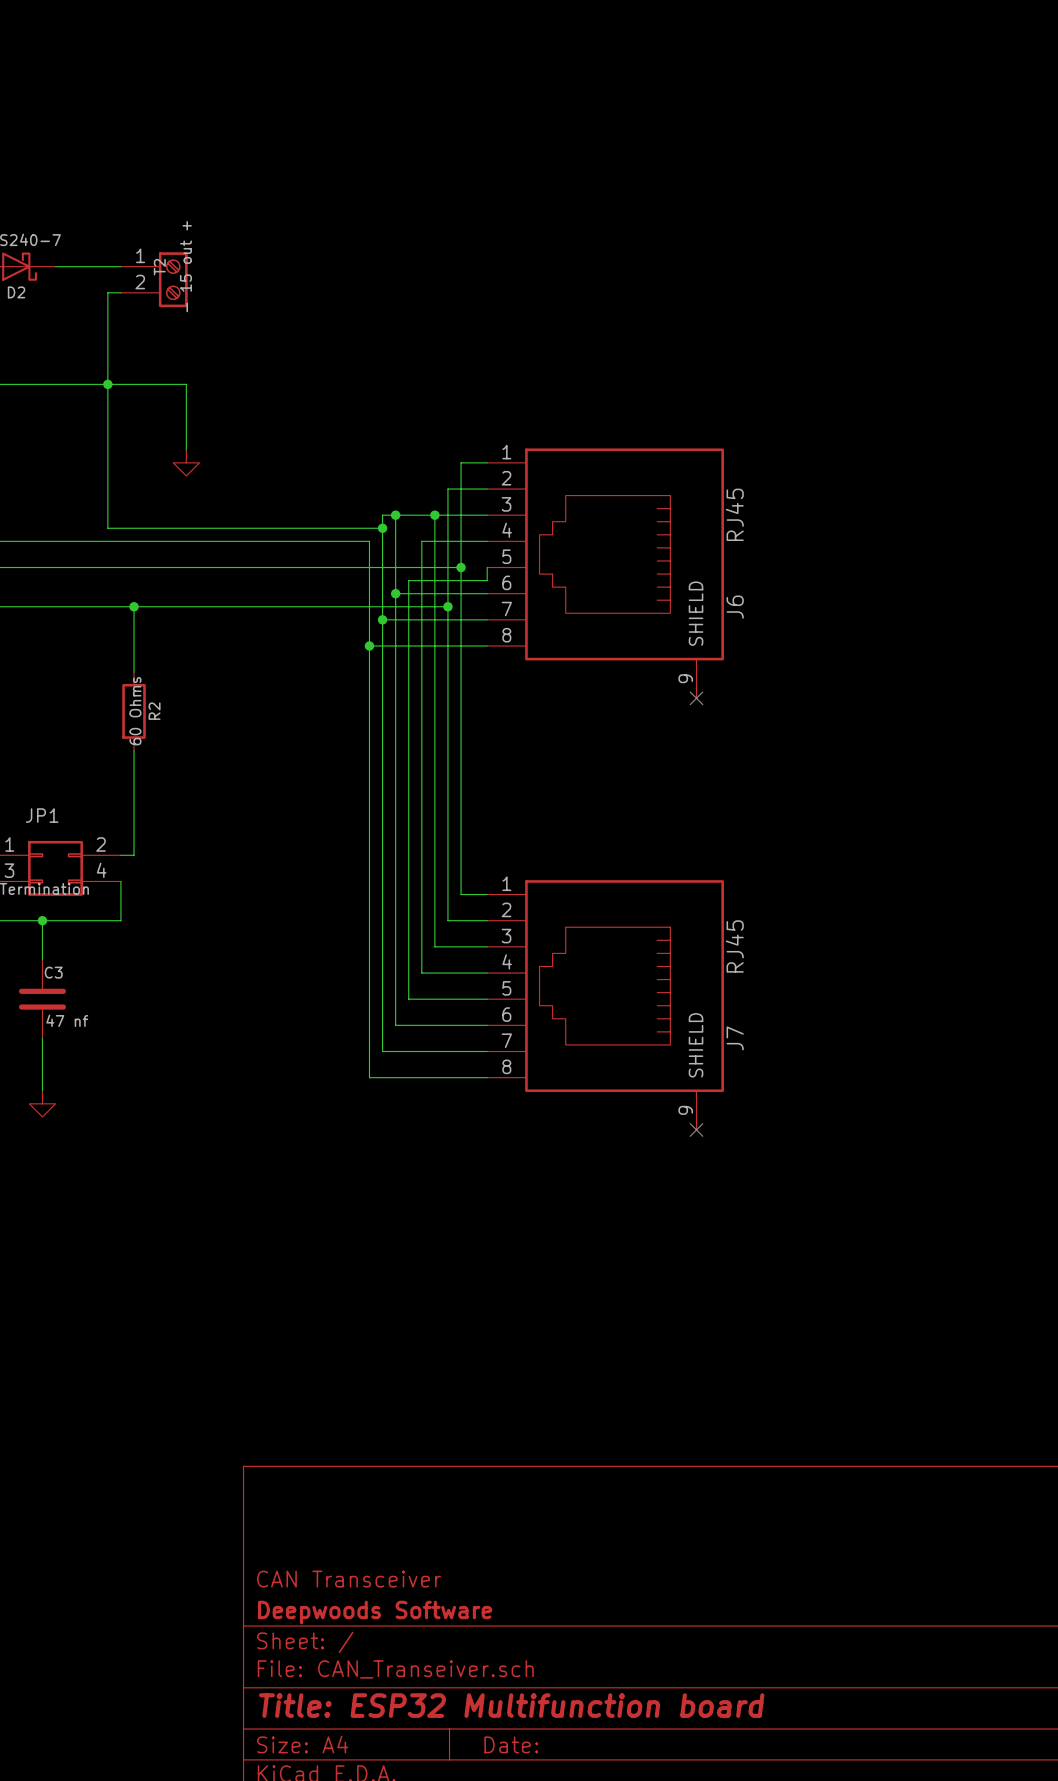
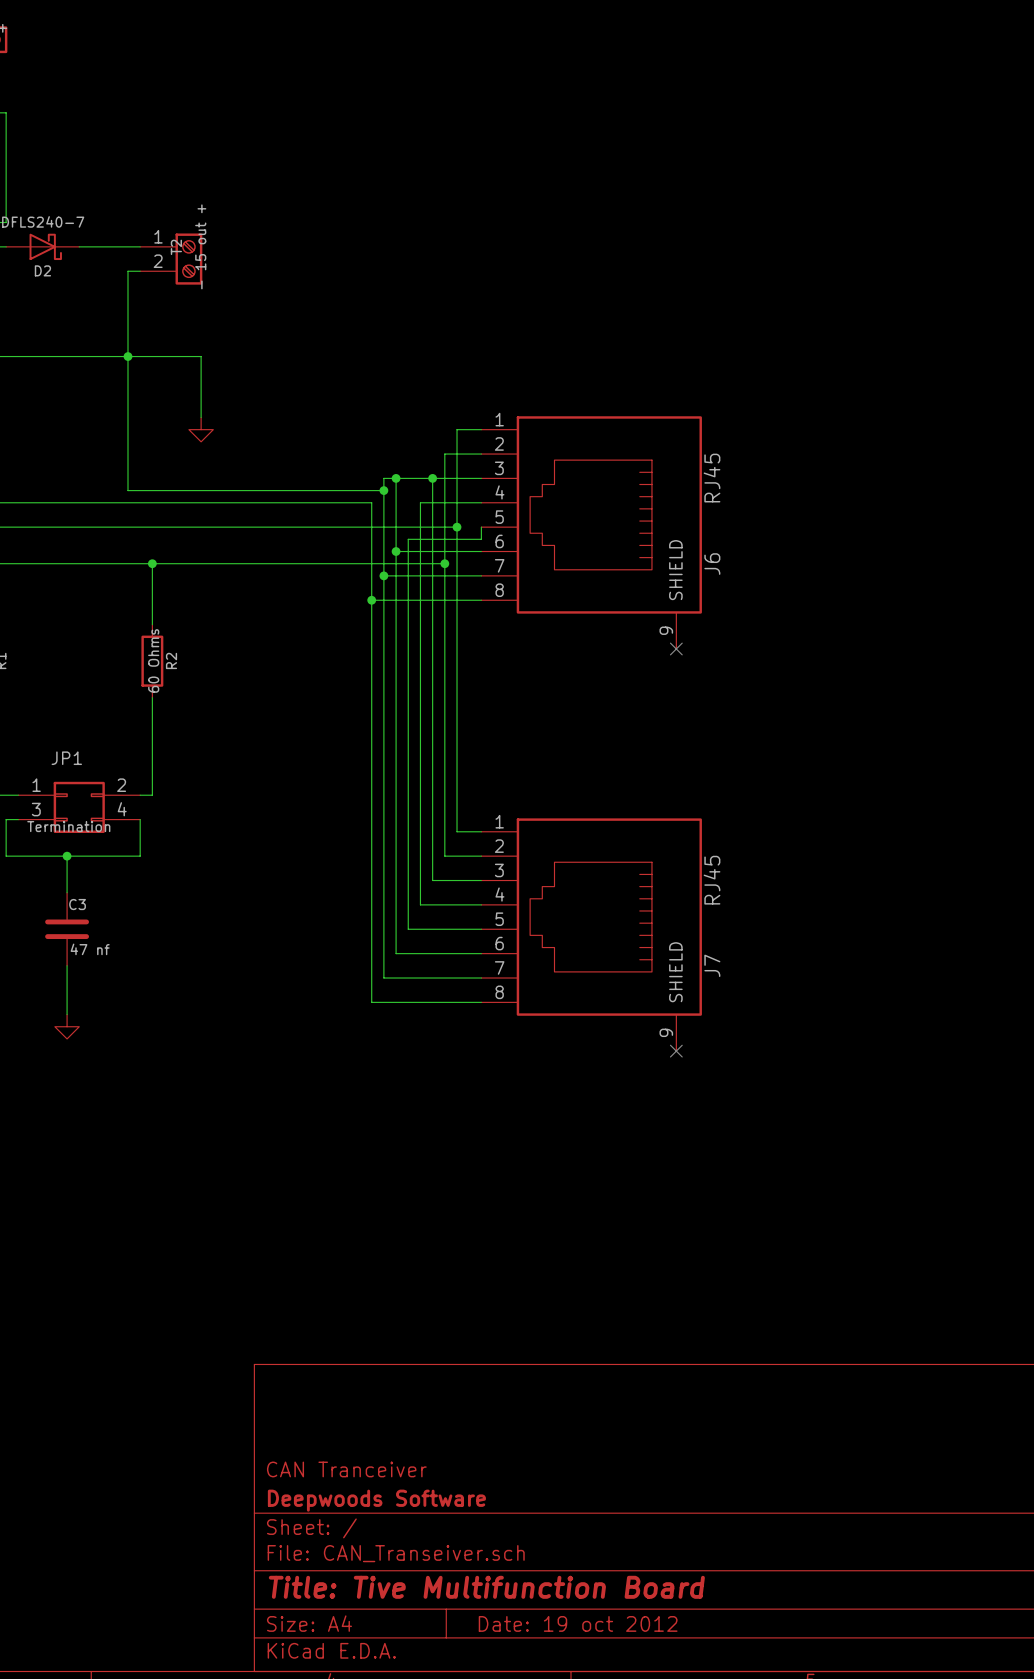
title block: CAN Transceiver (349, 1579) -> CAN Tranceiver (346, 1469)
title block: Title: ESP32 Multifunction board (511, 1705) -> Title: Tive Multifunction Board (486, 1587)
title block: Date: (511, 1744) -> Date: 19 oct 2012 (578, 1623)

